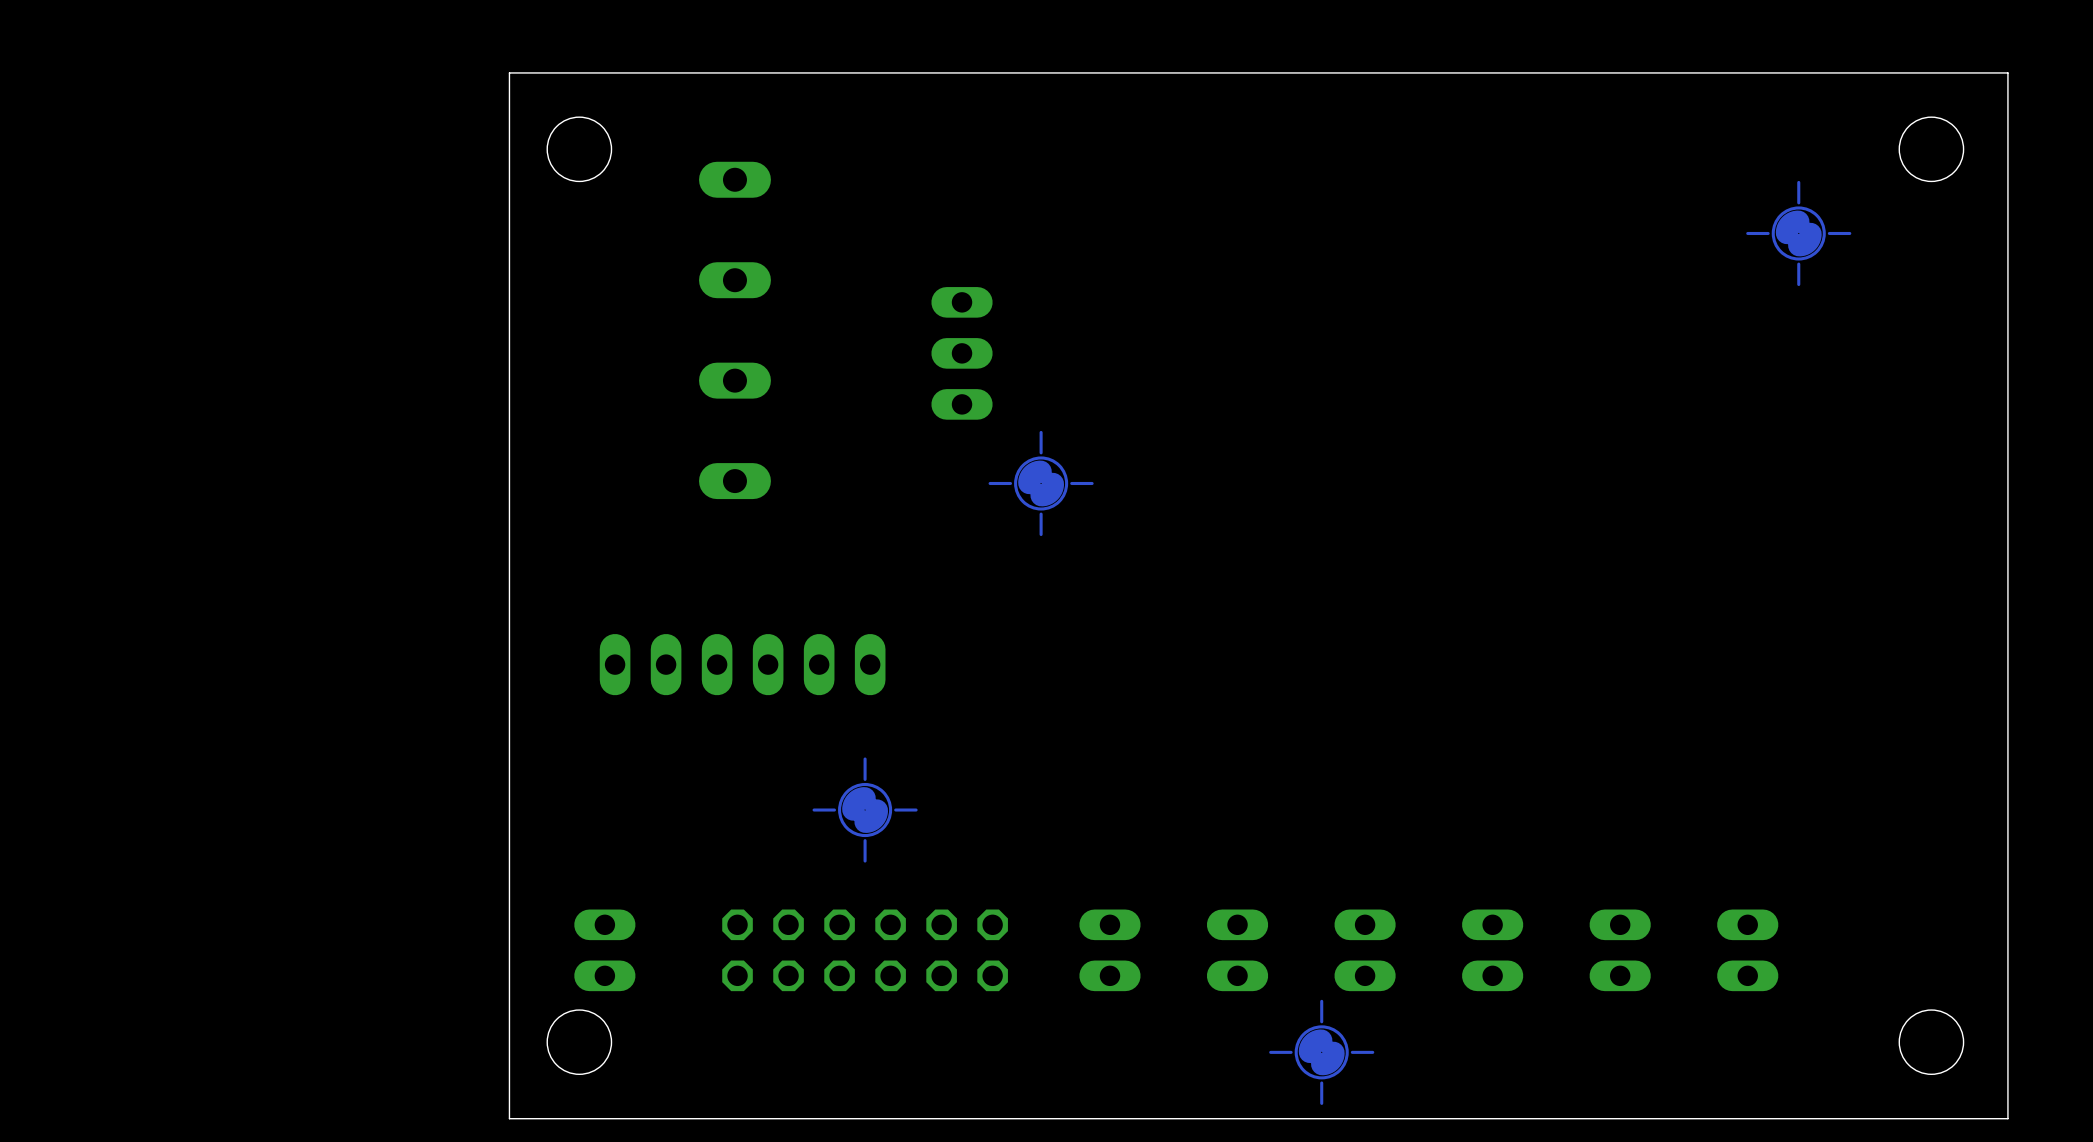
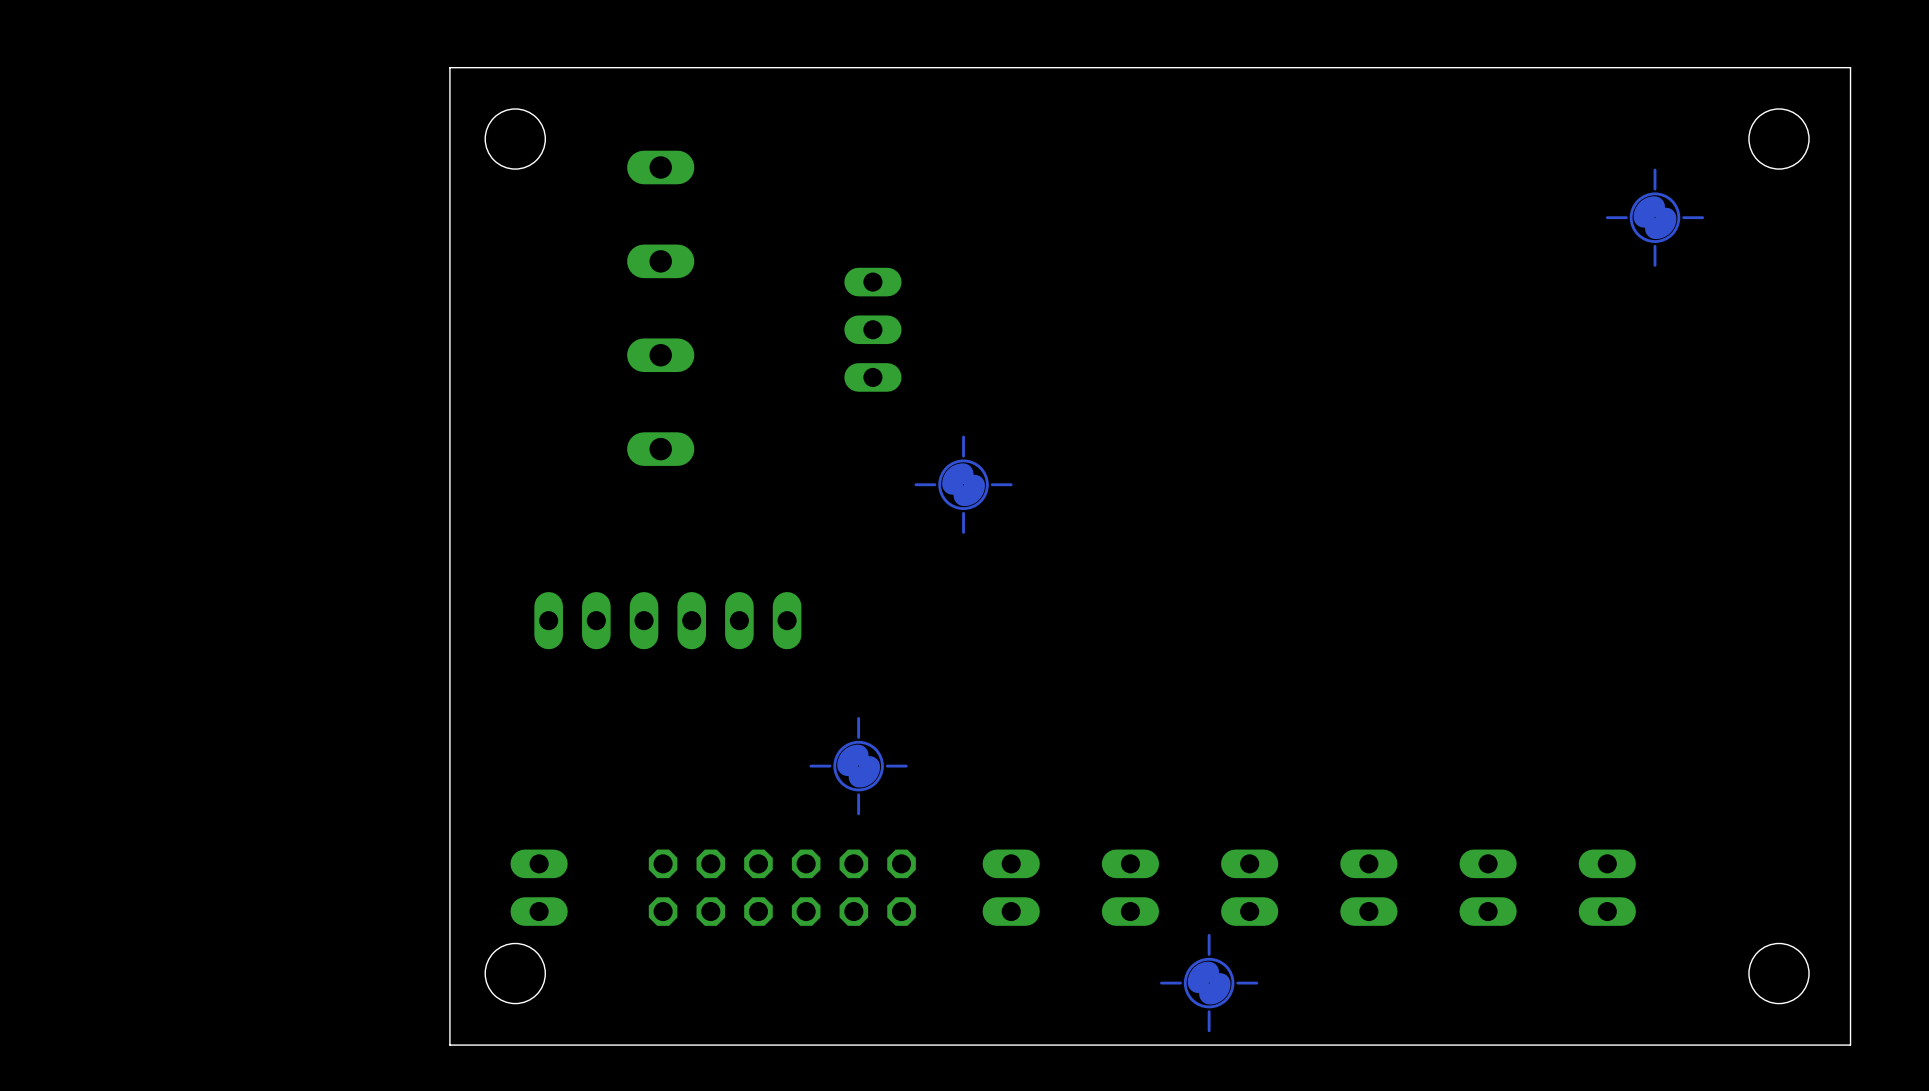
drawing position: (1041, 483) -> (963, 484)
drawing position: (865, 810) -> (858, 766)

